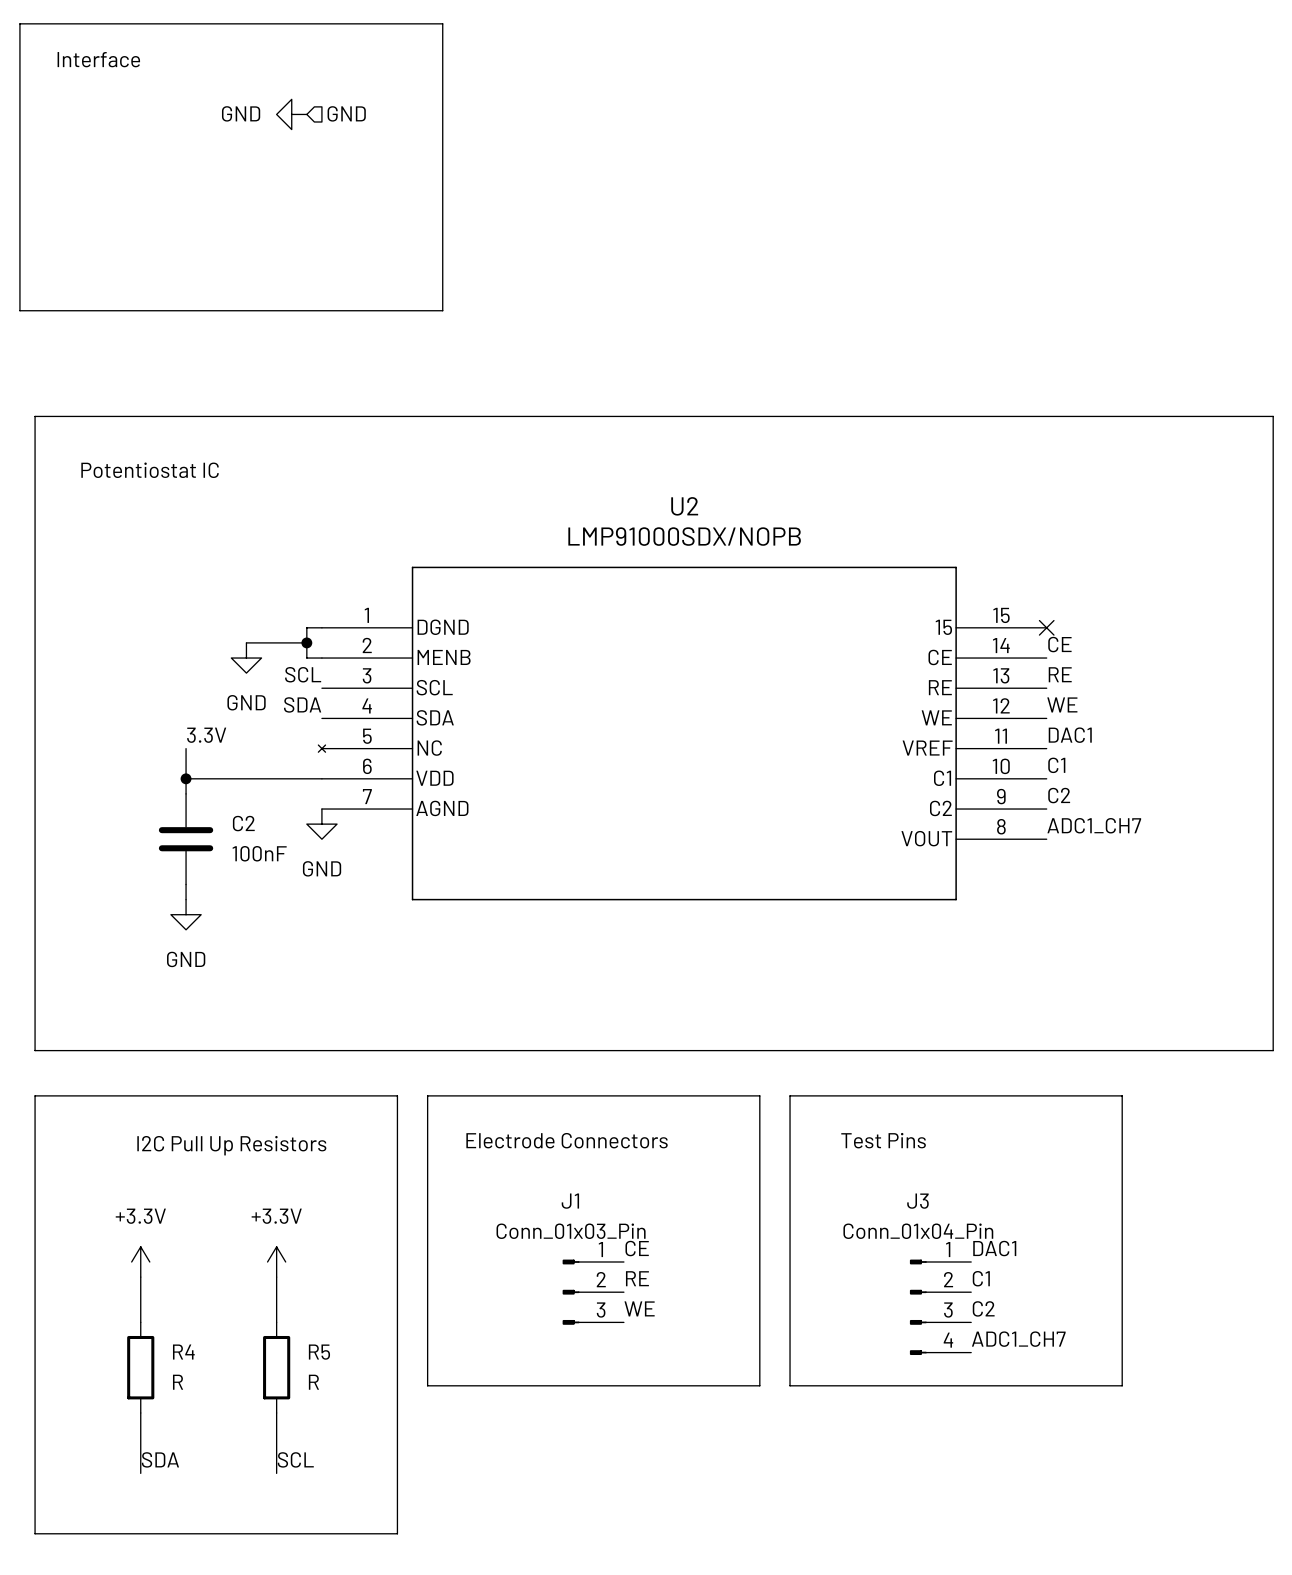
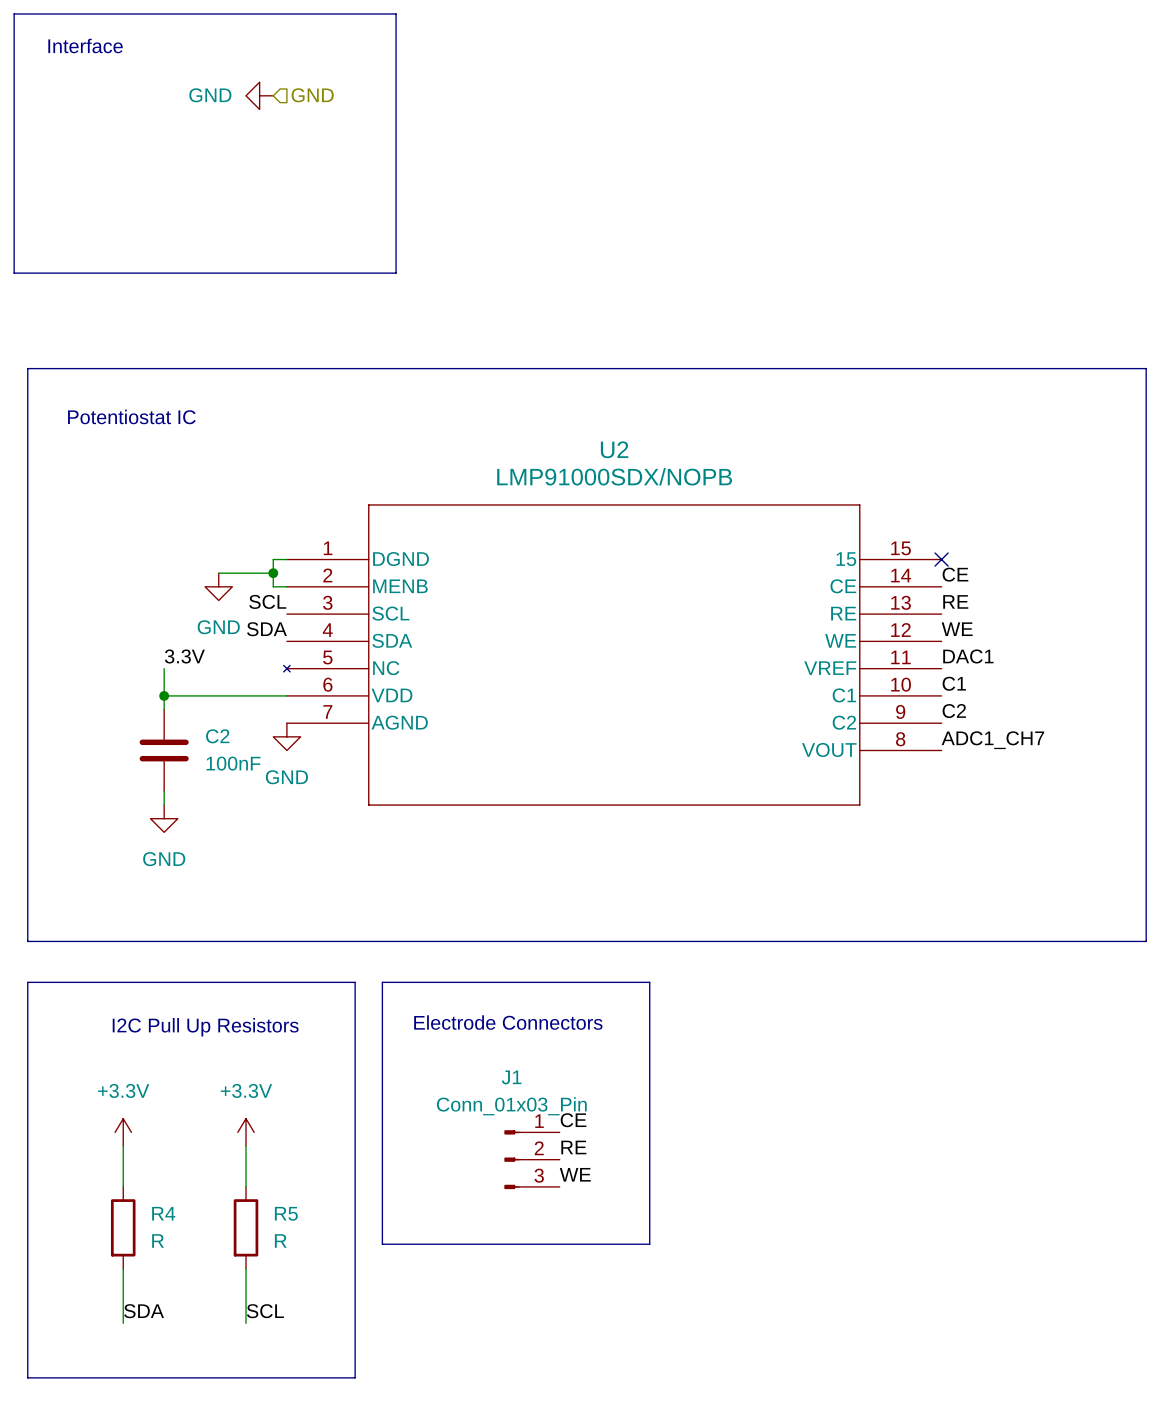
line: (723, 1095) (759, 1095) (759, 1385) (723, 1385) -> (649, 982) (649, 1244)
line: (790, 1095) (1122, 1095) (1122, 1385) (790, 1385) (790, 1095) -> none
text: Test Pins (883, 1140) -> none
label: DAC1 (994, 1248) -> none
label: C1 (981, 1278) -> none
J3: Conn_01x04_Pin (940, 1307) -> none
label: C2 (983, 1308) -> none
label: ADC1_CH7 (1018, 1339) -> none

